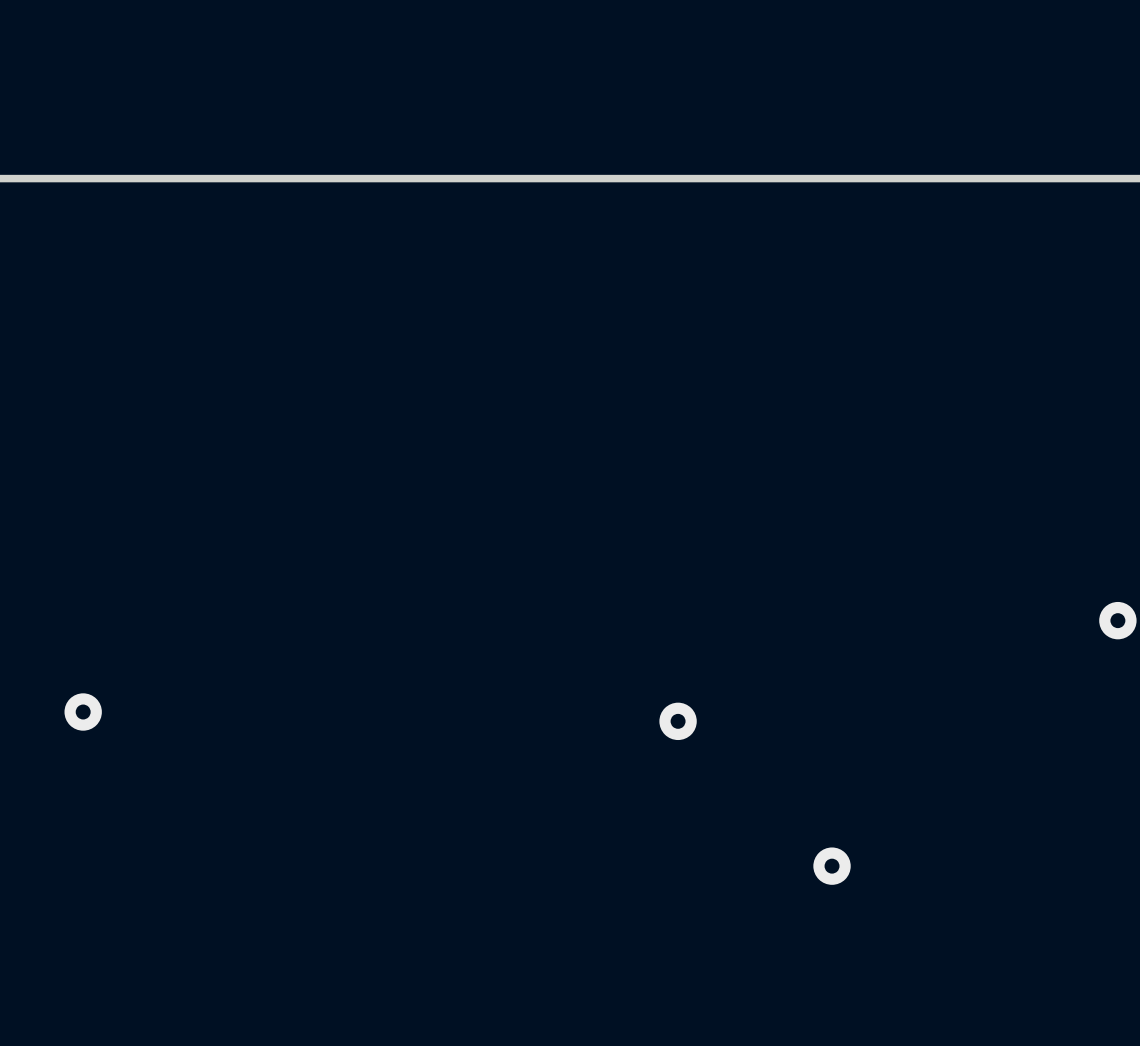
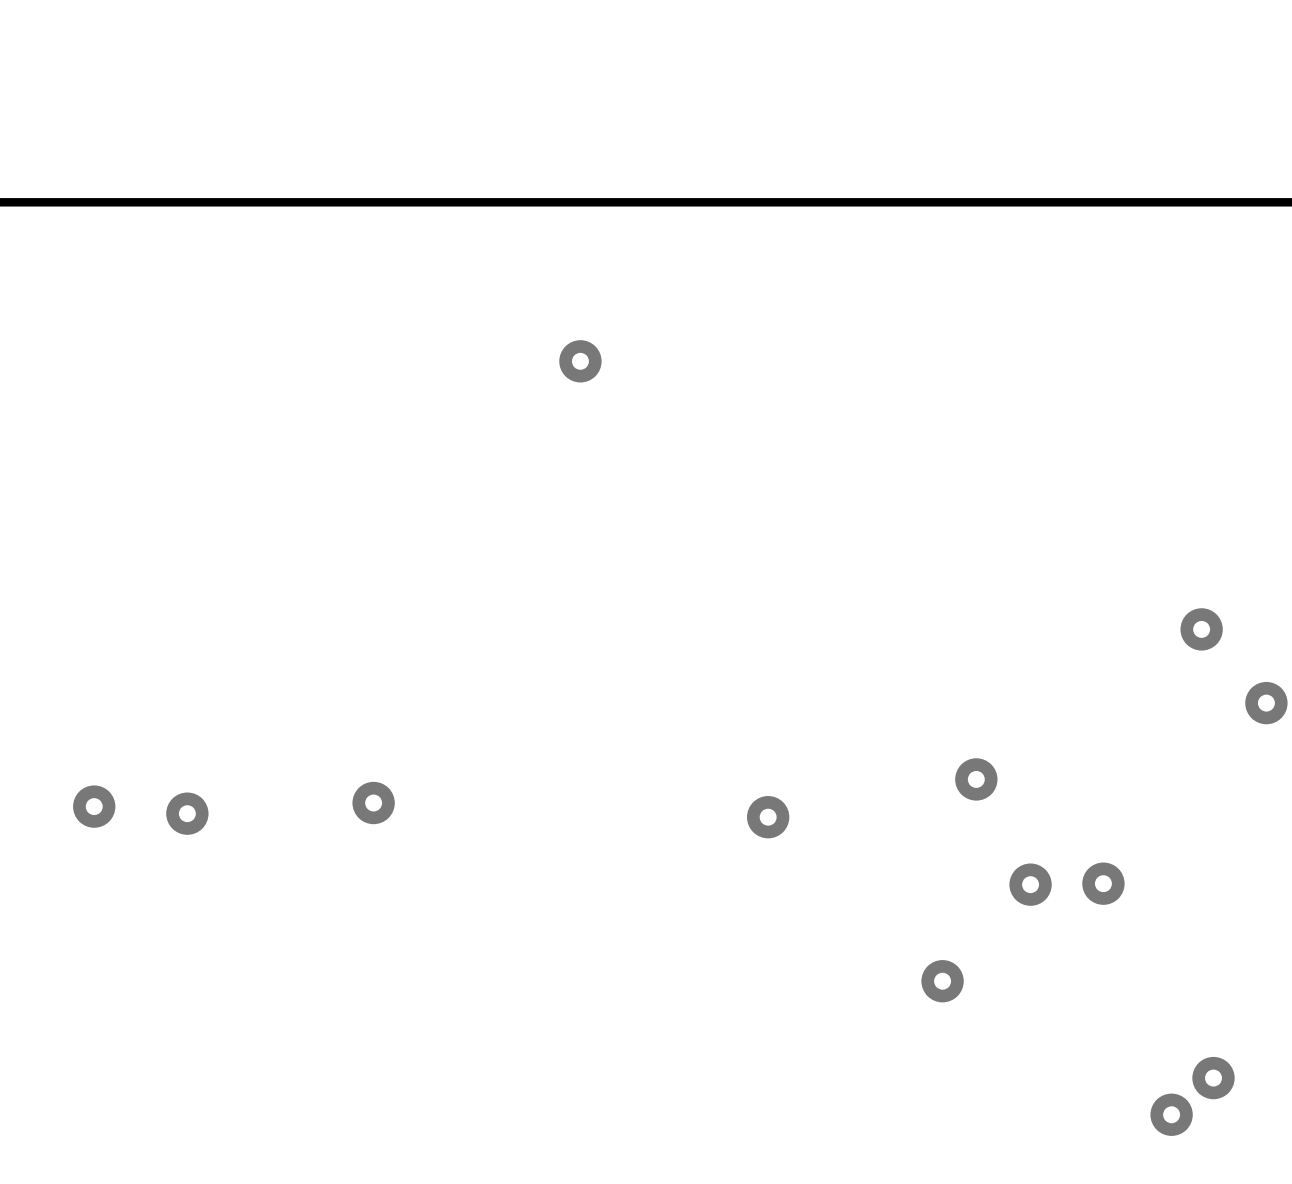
via: none -> (580, 361)
via: none -> (1201, 629)
via: none -> (976, 779)
via: none -> (373, 803)
via: none -> (187, 813)
via: none -> (1030, 884)
via: none -> (1103, 883)
via: none -> (1213, 1078)
via: none -> (1171, 1114)

